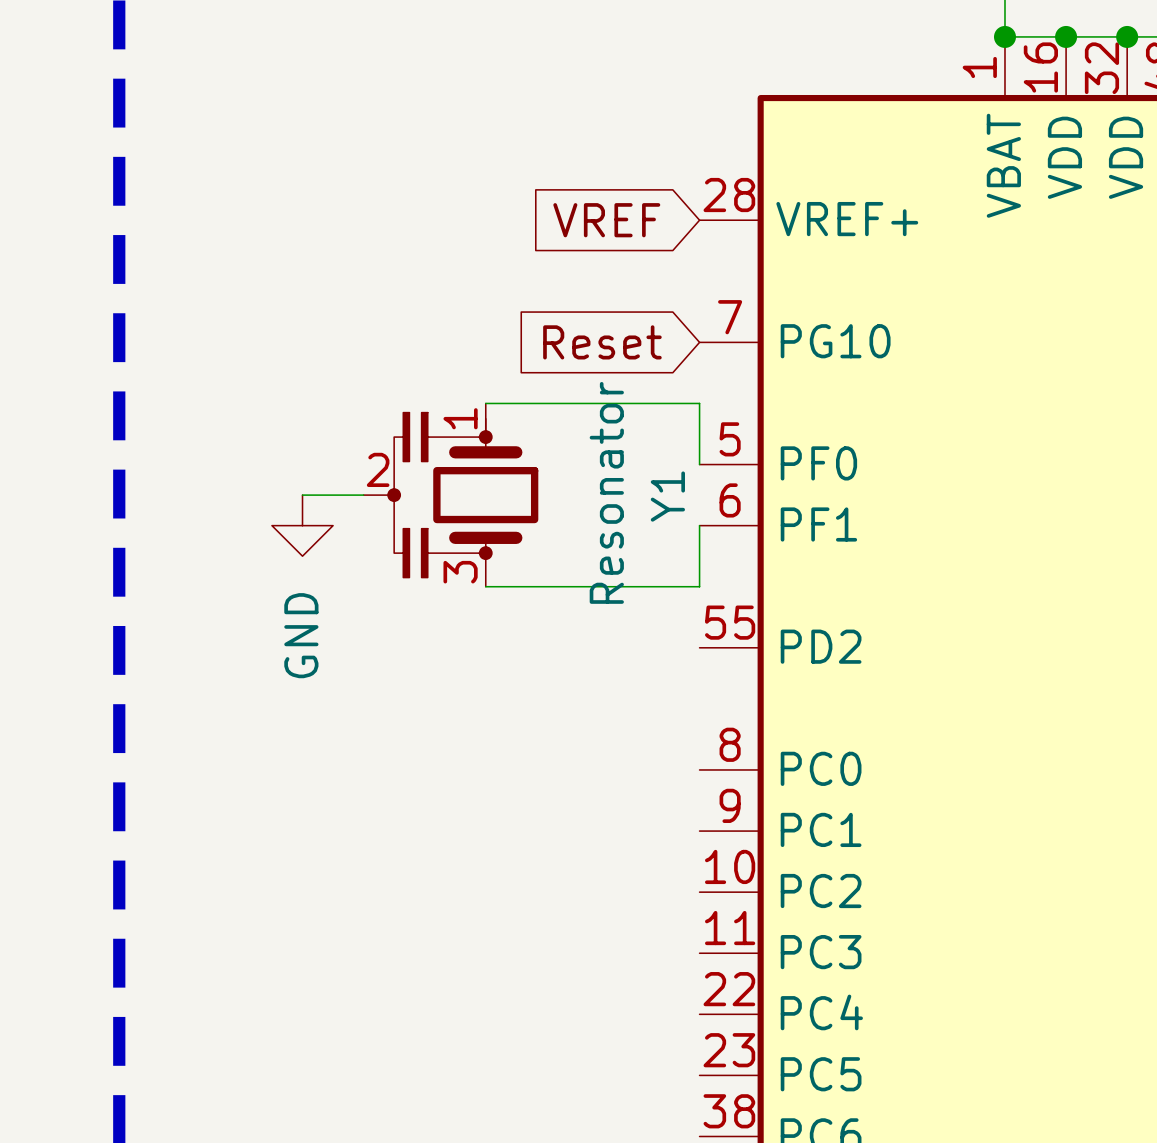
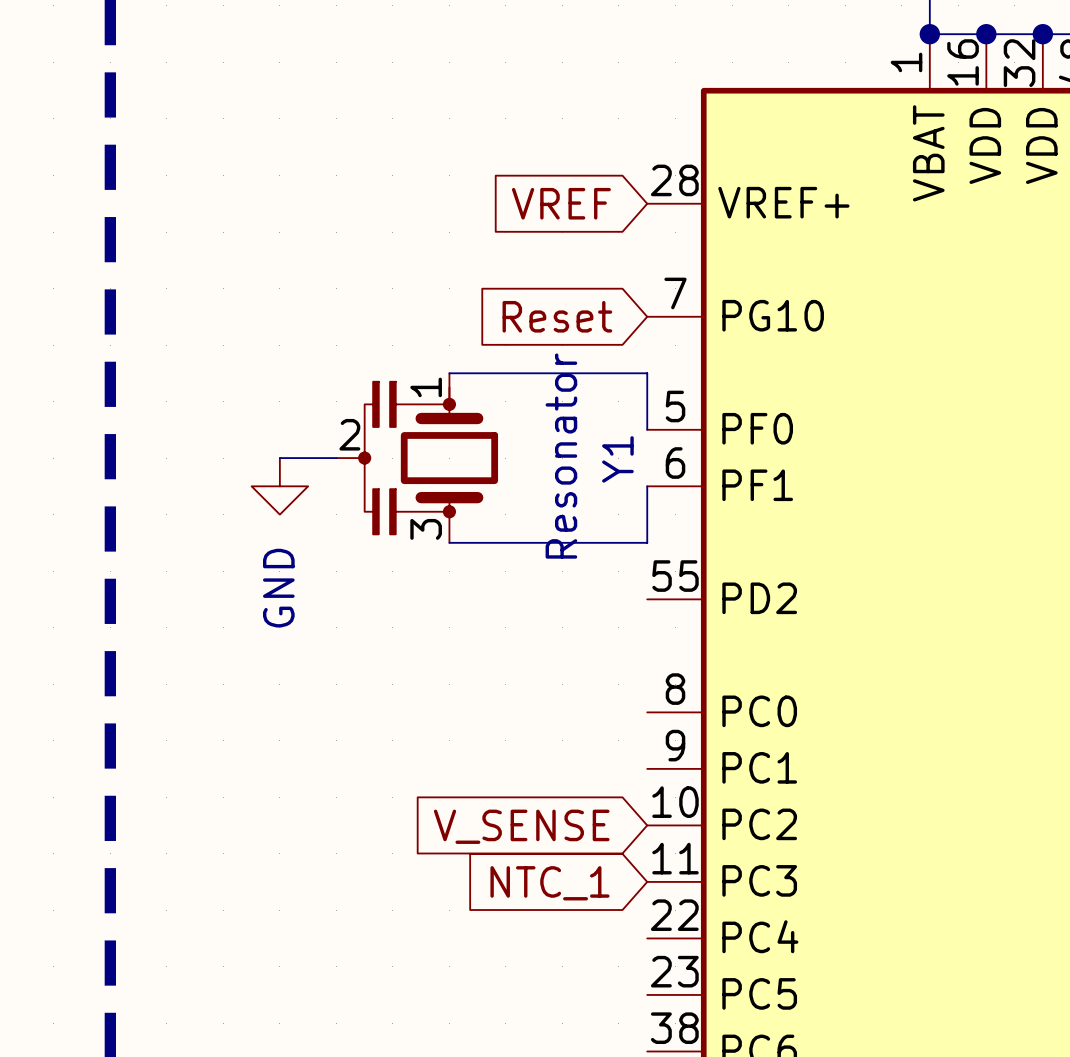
global label: none -> V_SENSE (521, 826)
global label: none -> NTC_1 (549, 883)

